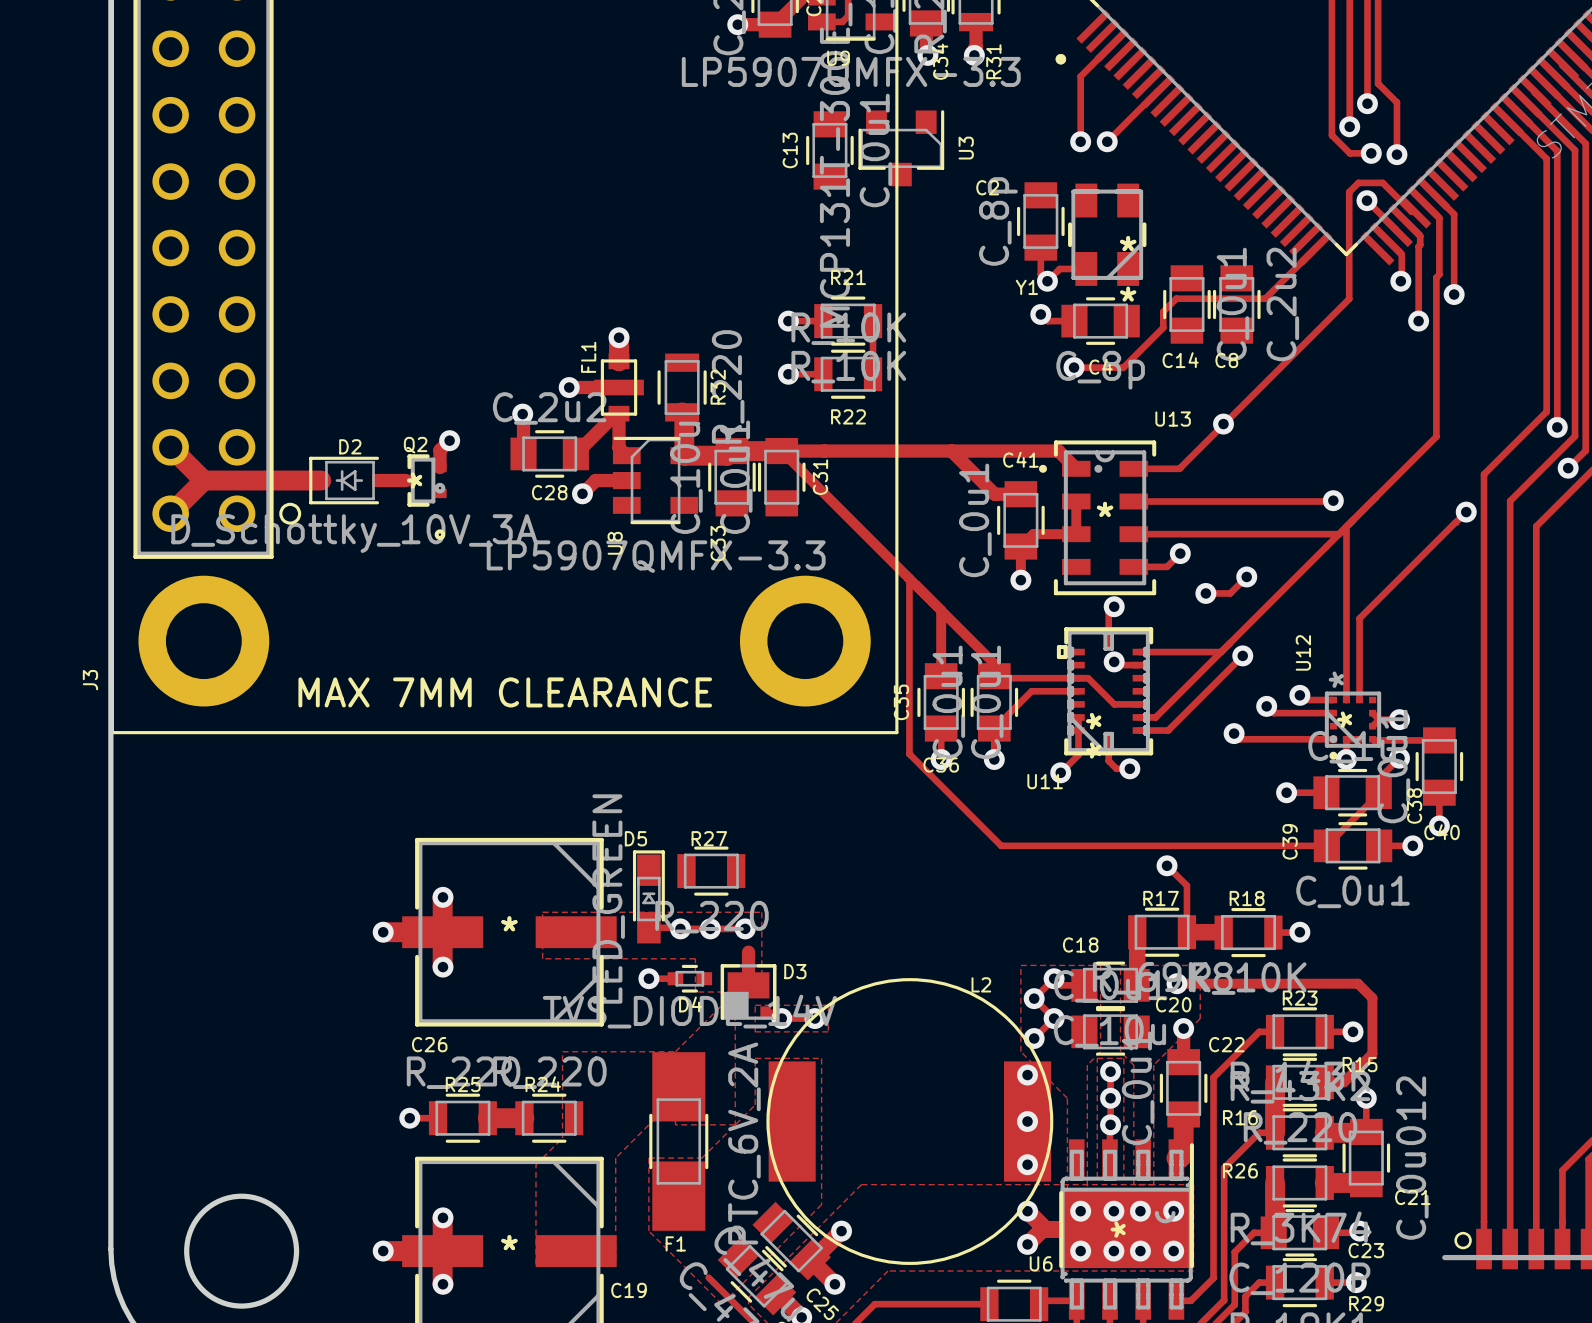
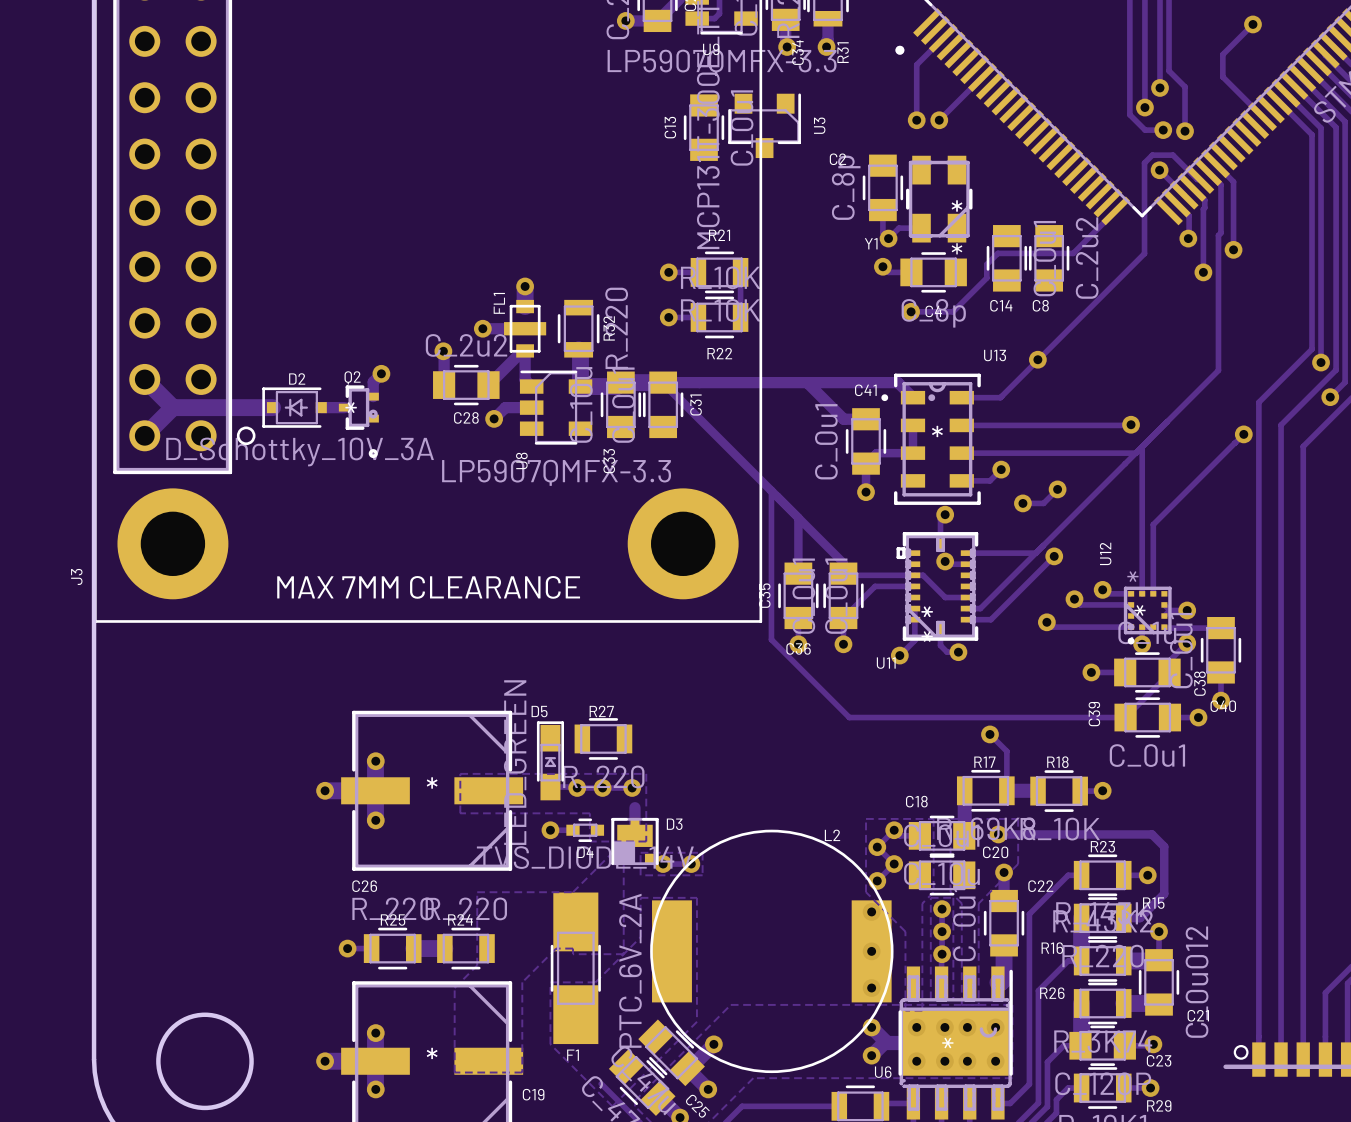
track: none -> (1252, 24) (1222, 54) (1222, 77) (1262, 116)
via: none -> (1252, 24)

